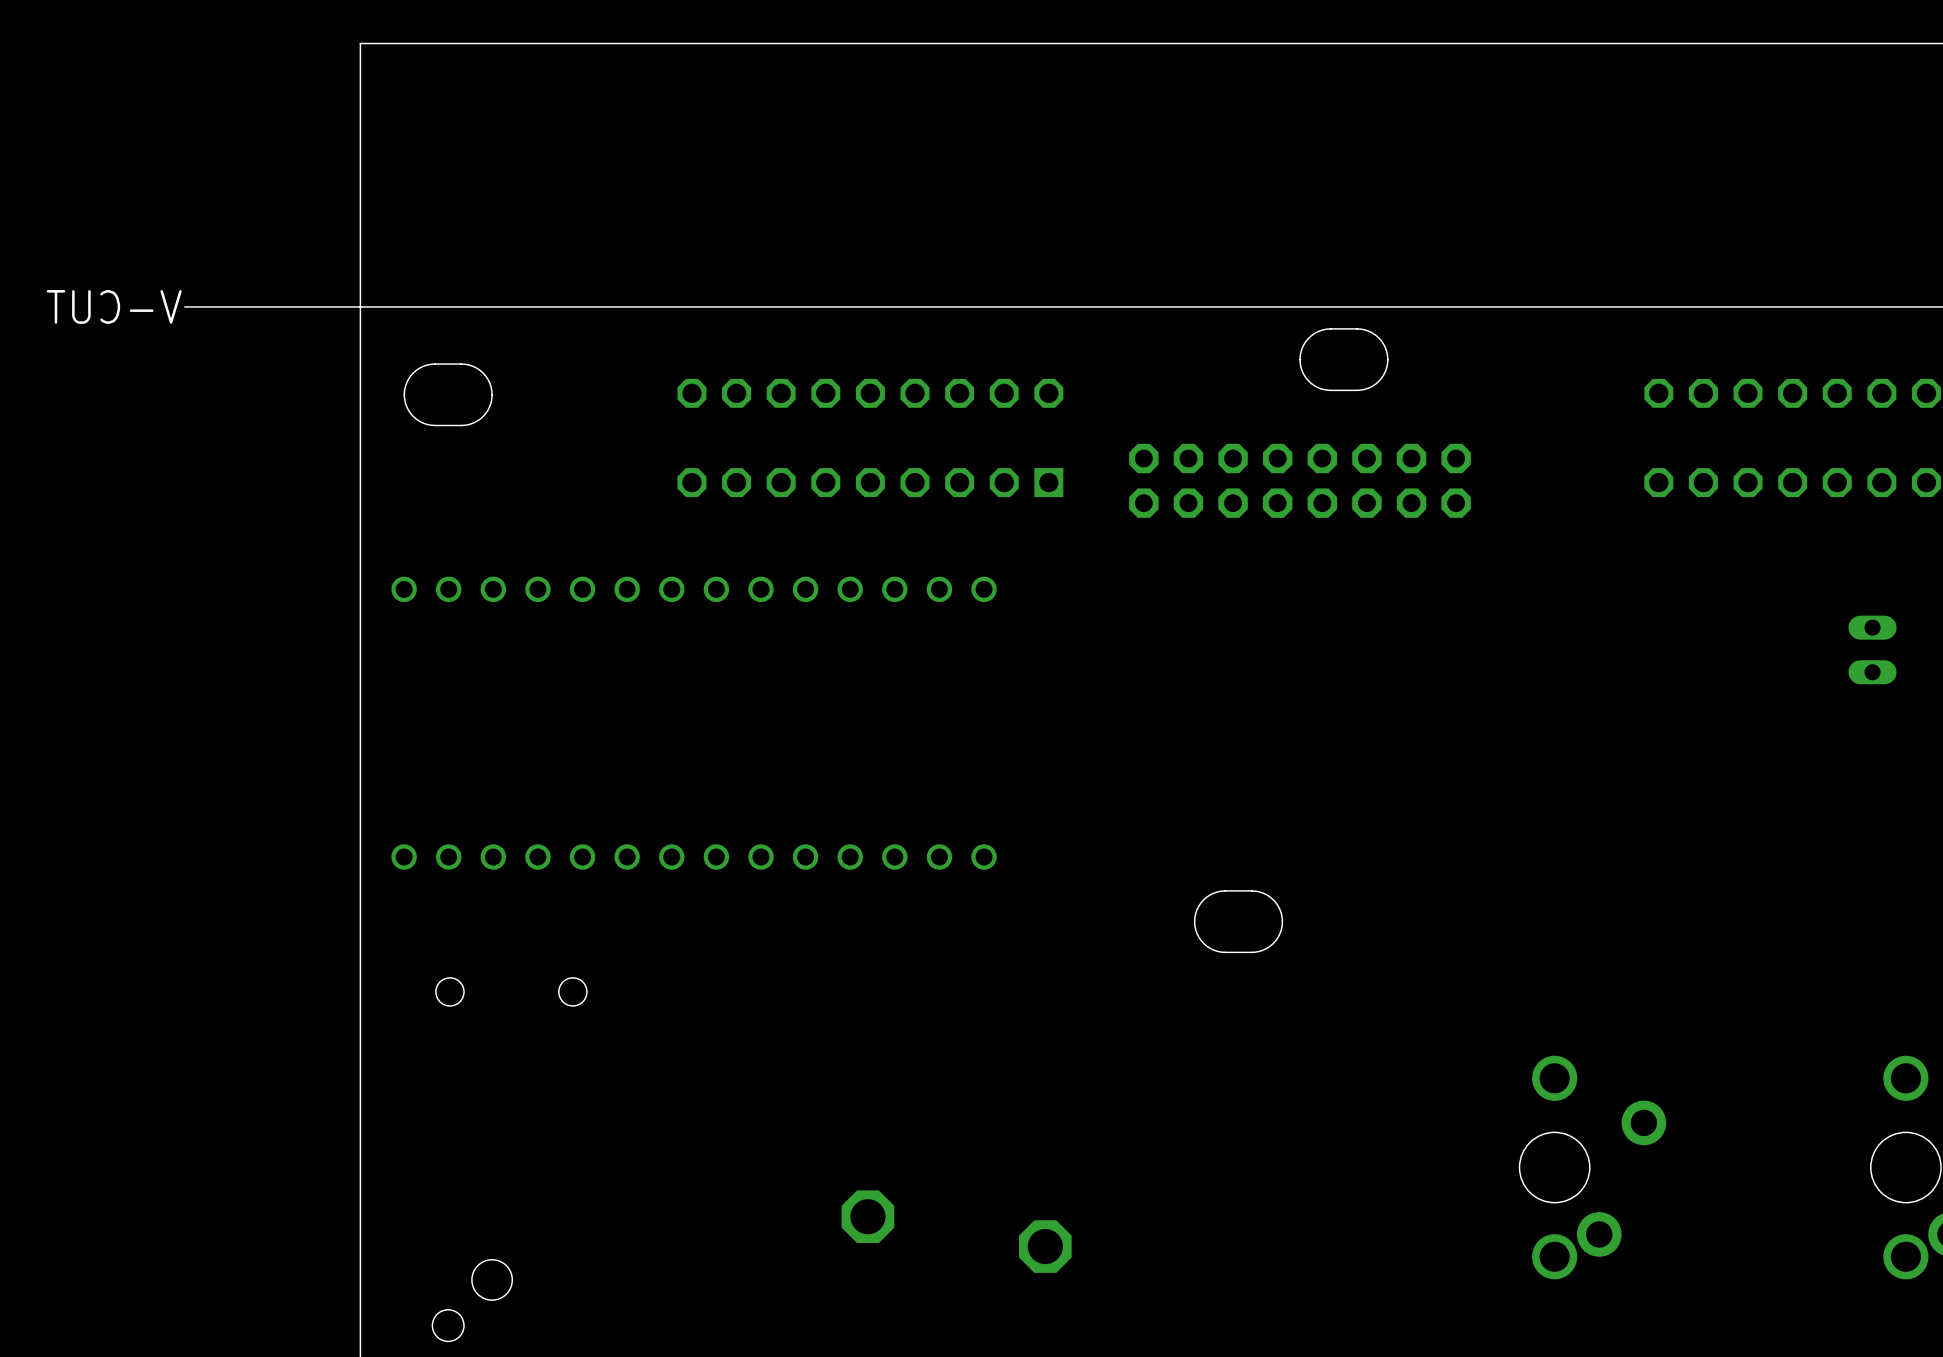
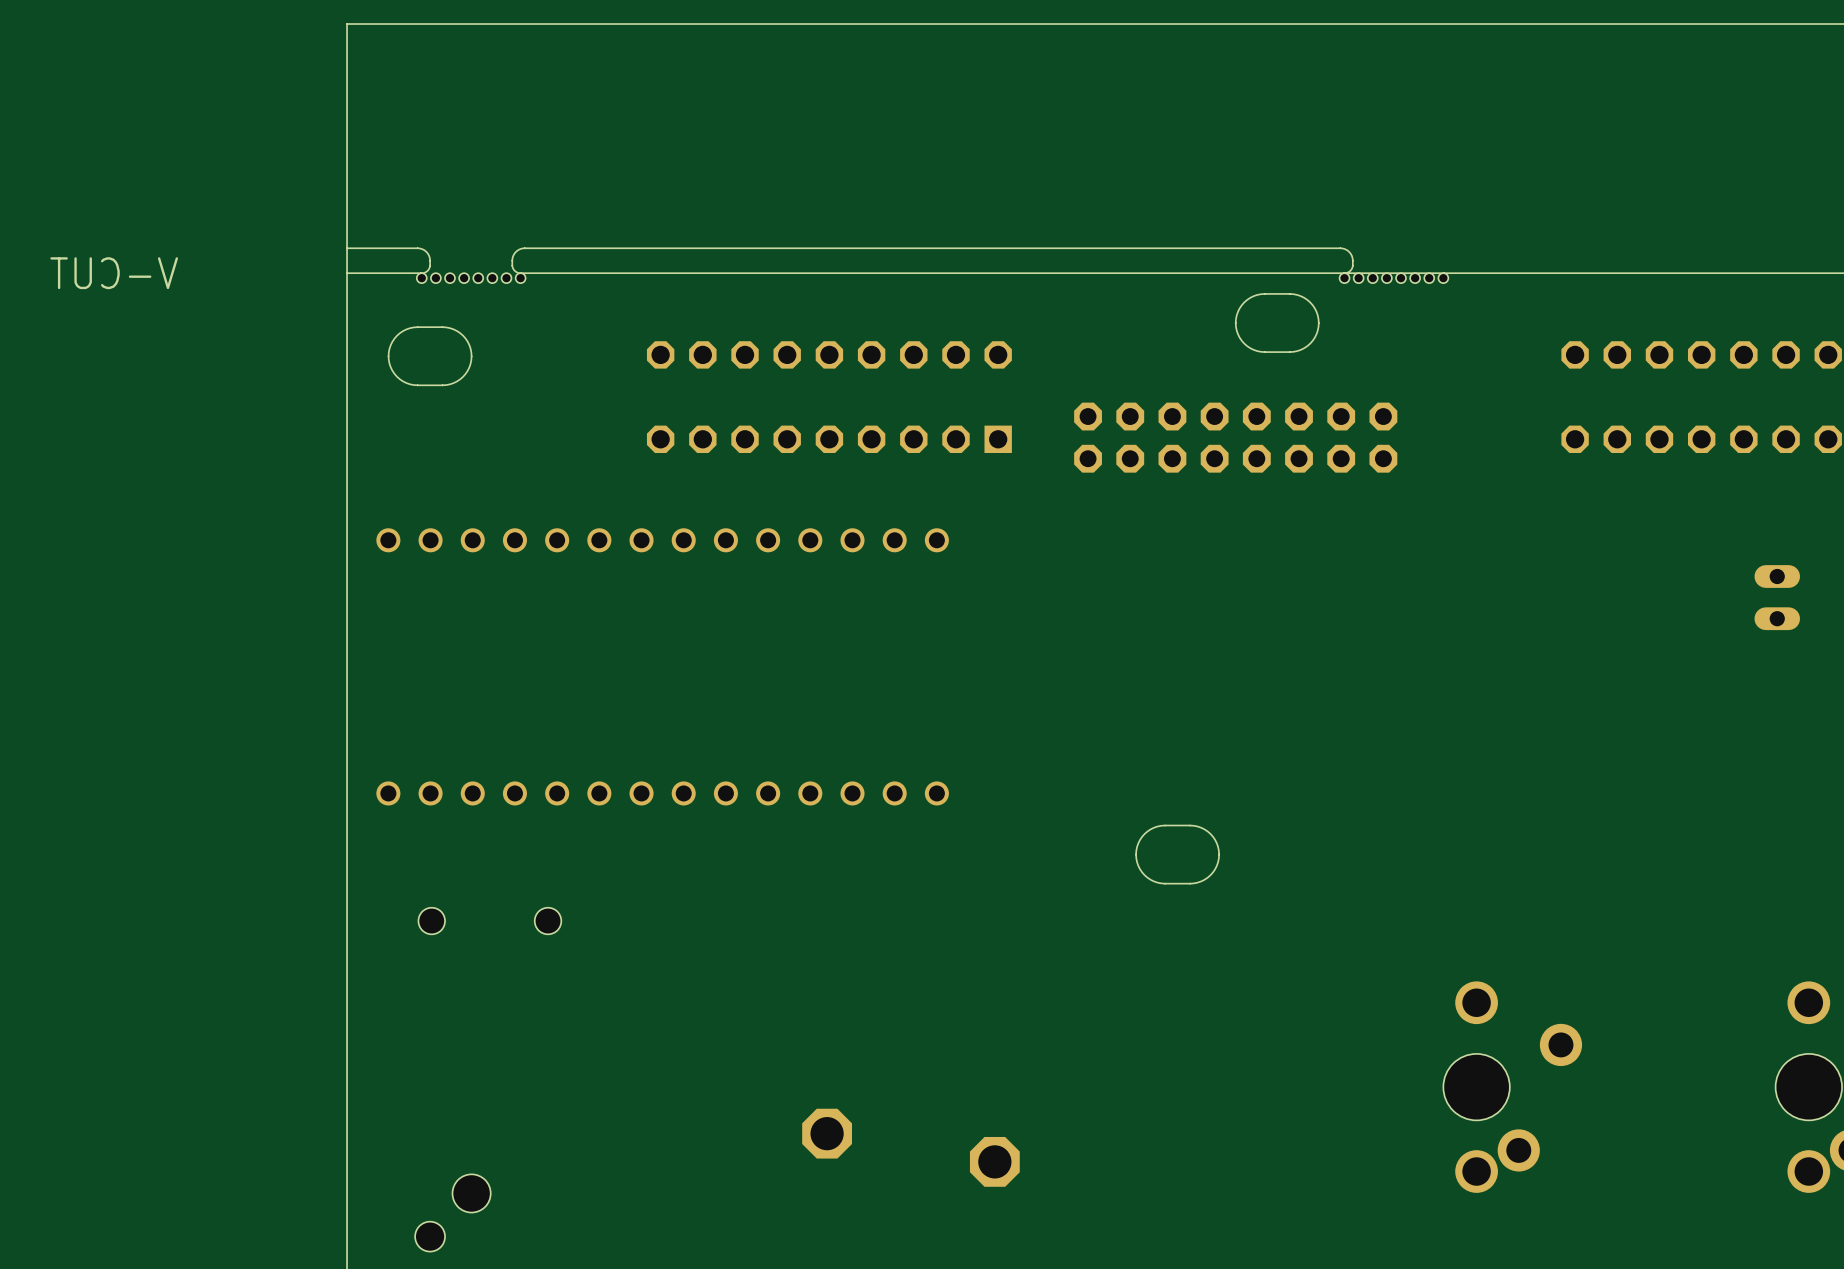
board edge: (360, 306) (184, 306) -> none
board edge: (544, 306) (438, 306) -> (347, 248) (420, 248) (427, 253) (430, 260) (428, 269) (420, 273)
board edge: none -> (1343, 273) (1351, 269) (1352, 259) (1347, 250) (1340, 248) (524, 248) (517, 250) (512, 259) (513, 269) (521, 273)
hole: none -> (421, 278)
hole: none -> (435, 278)
hole: none -> (450, 278)
hole: none -> (464, 278)
hole: none -> (478, 278)
hole: none -> (492, 278)
hole: none -> (506, 278)
hole: none -> (520, 278)
hole: none -> (1344, 278)
hole: none -> (1358, 278)
hole: none -> (1372, 278)
hole: none -> (1386, 278)
hole: none -> (1401, 278)
hole: none -> (1415, 278)
hole: none -> (1429, 278)
hole: none -> (1443, 278)

